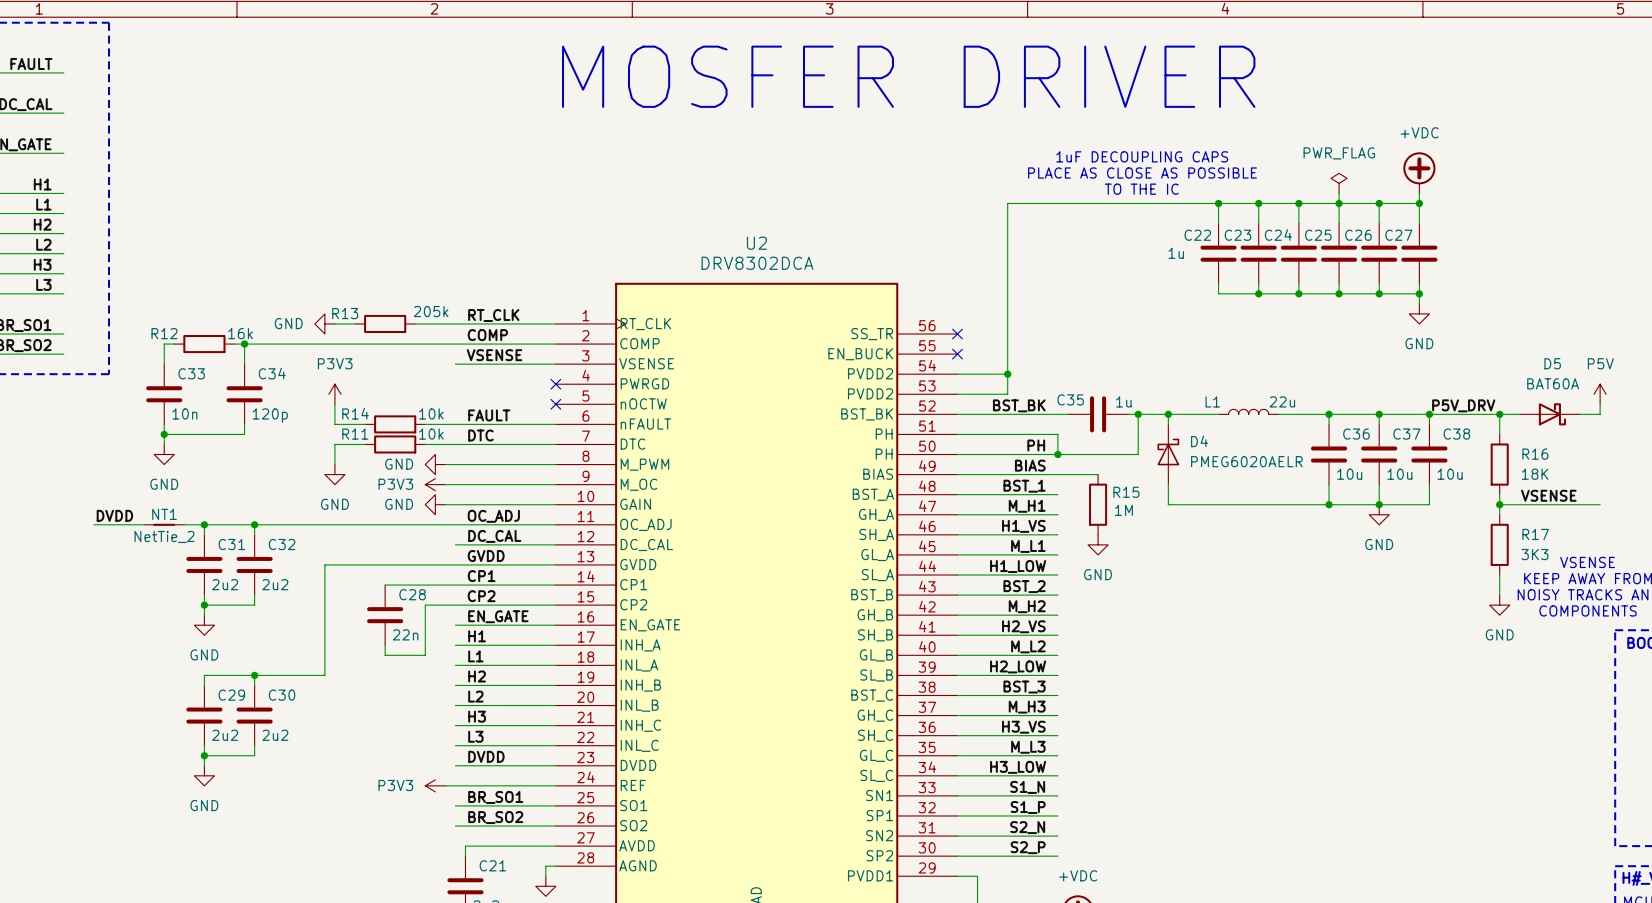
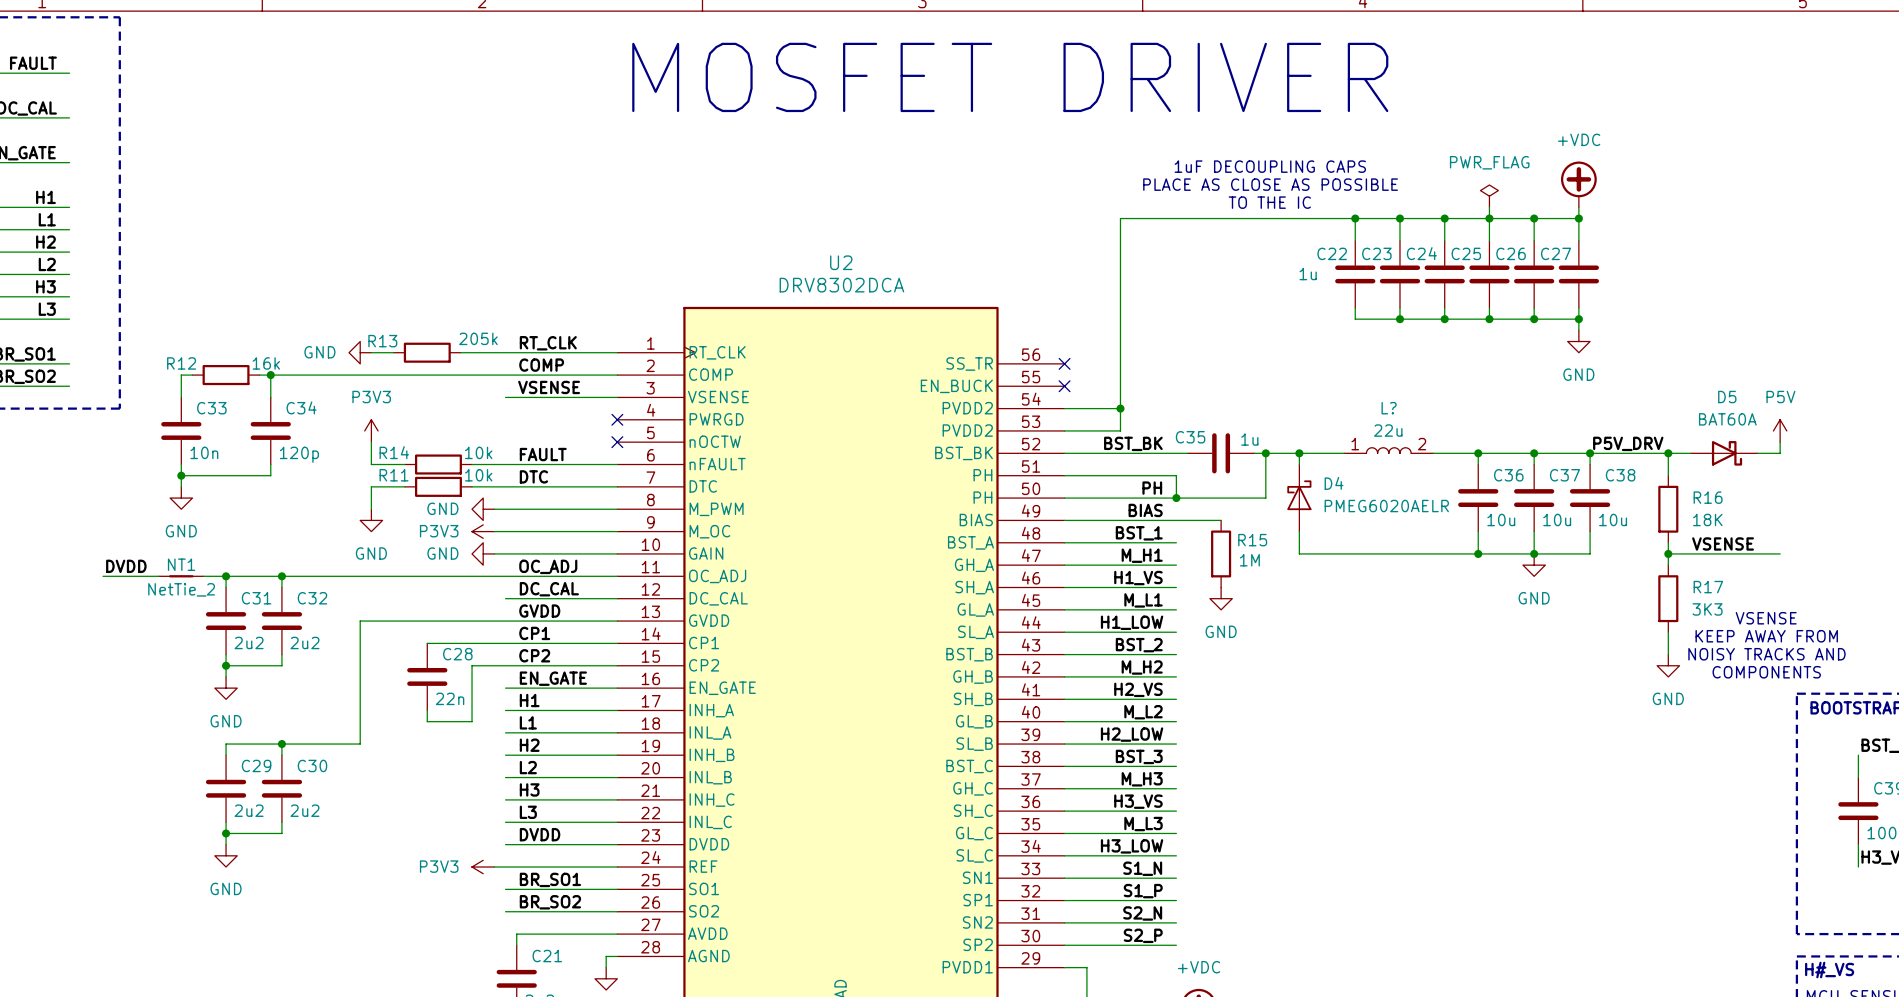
text: MOSFER DRIVER (908, 76) -> MOSFET DRIVER (1010, 77)
L1: 22u (1248, 411) -> none
L?: none -> 22u (1388, 450)

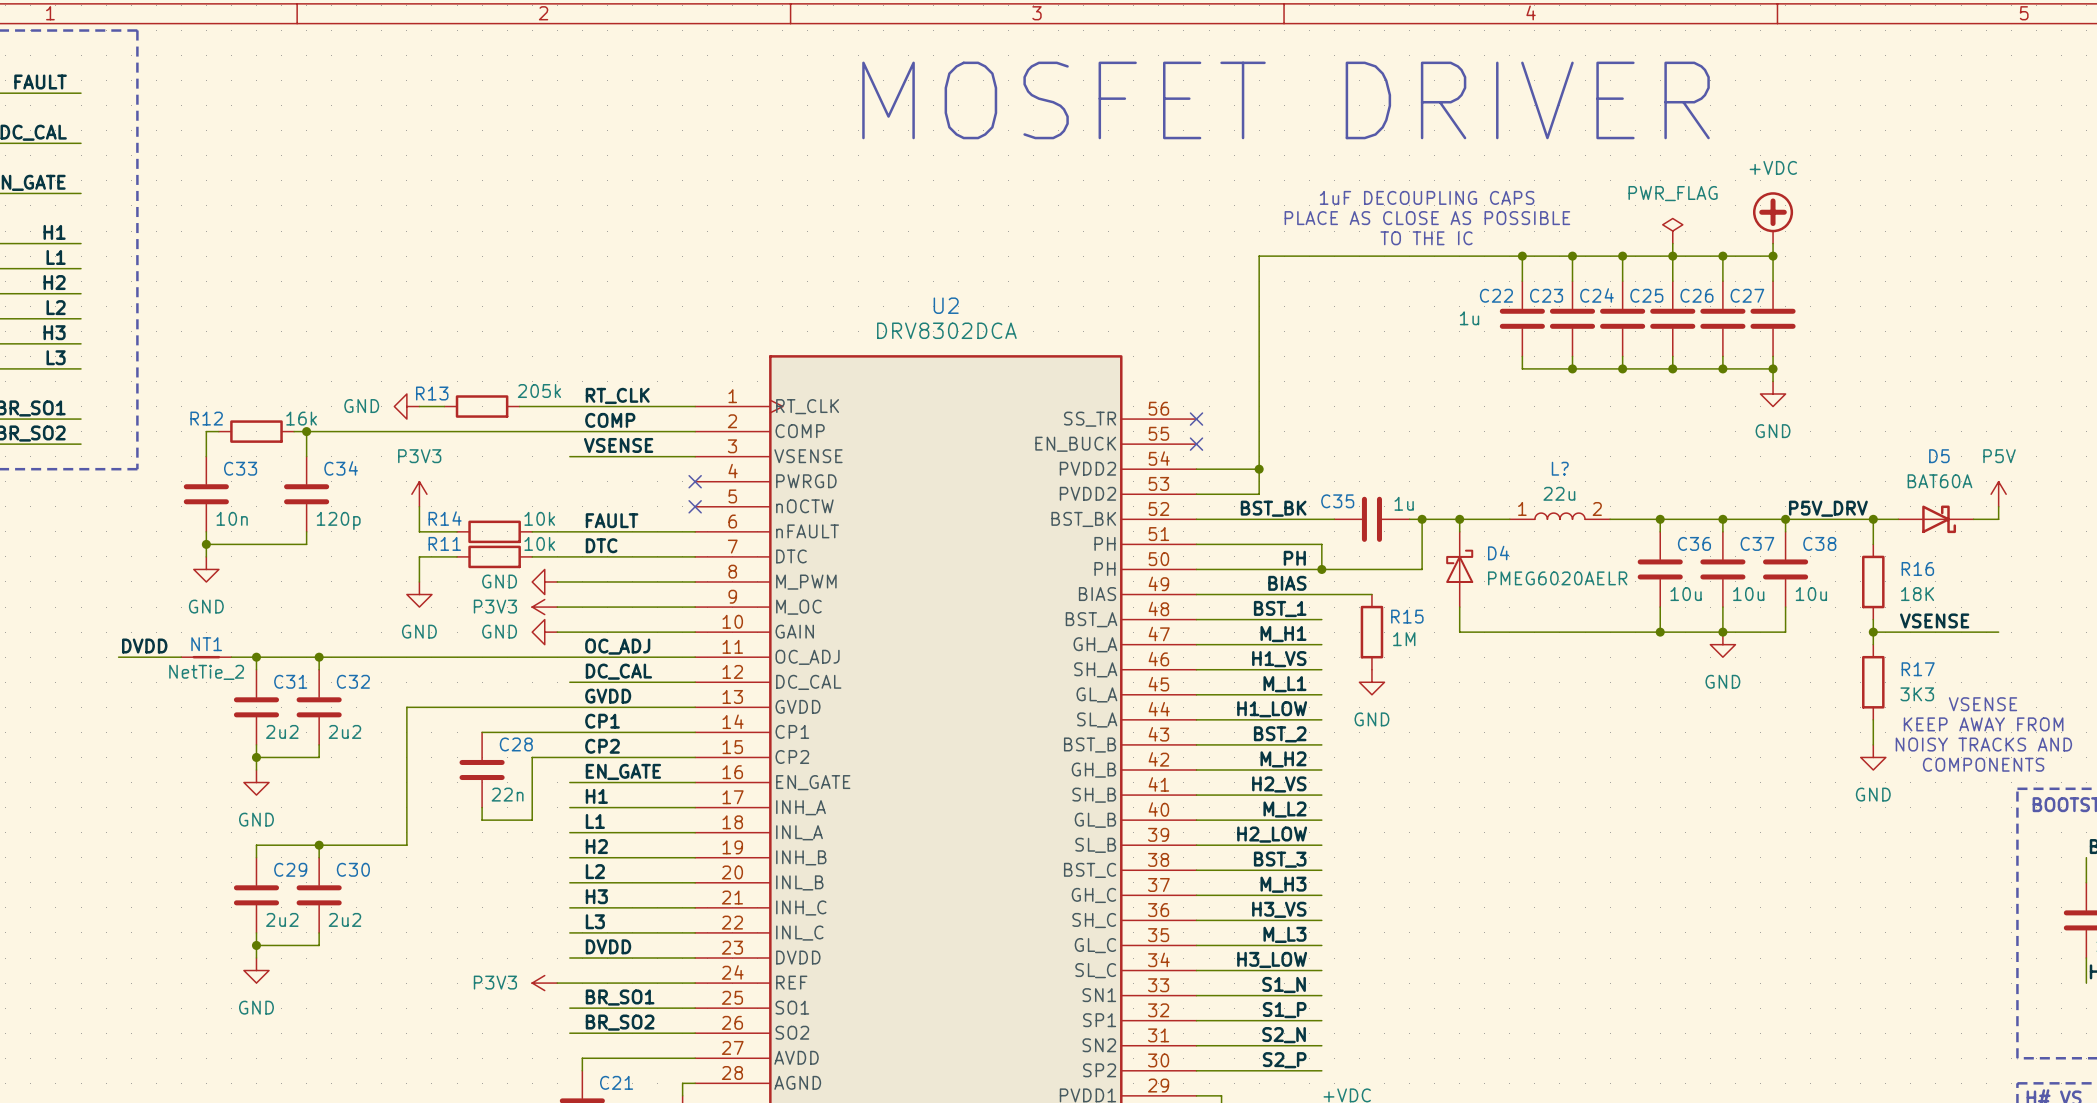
text position: MOSFET DRIVER (1010, 77) -> MOSFET DRIVER (1286, 100)

